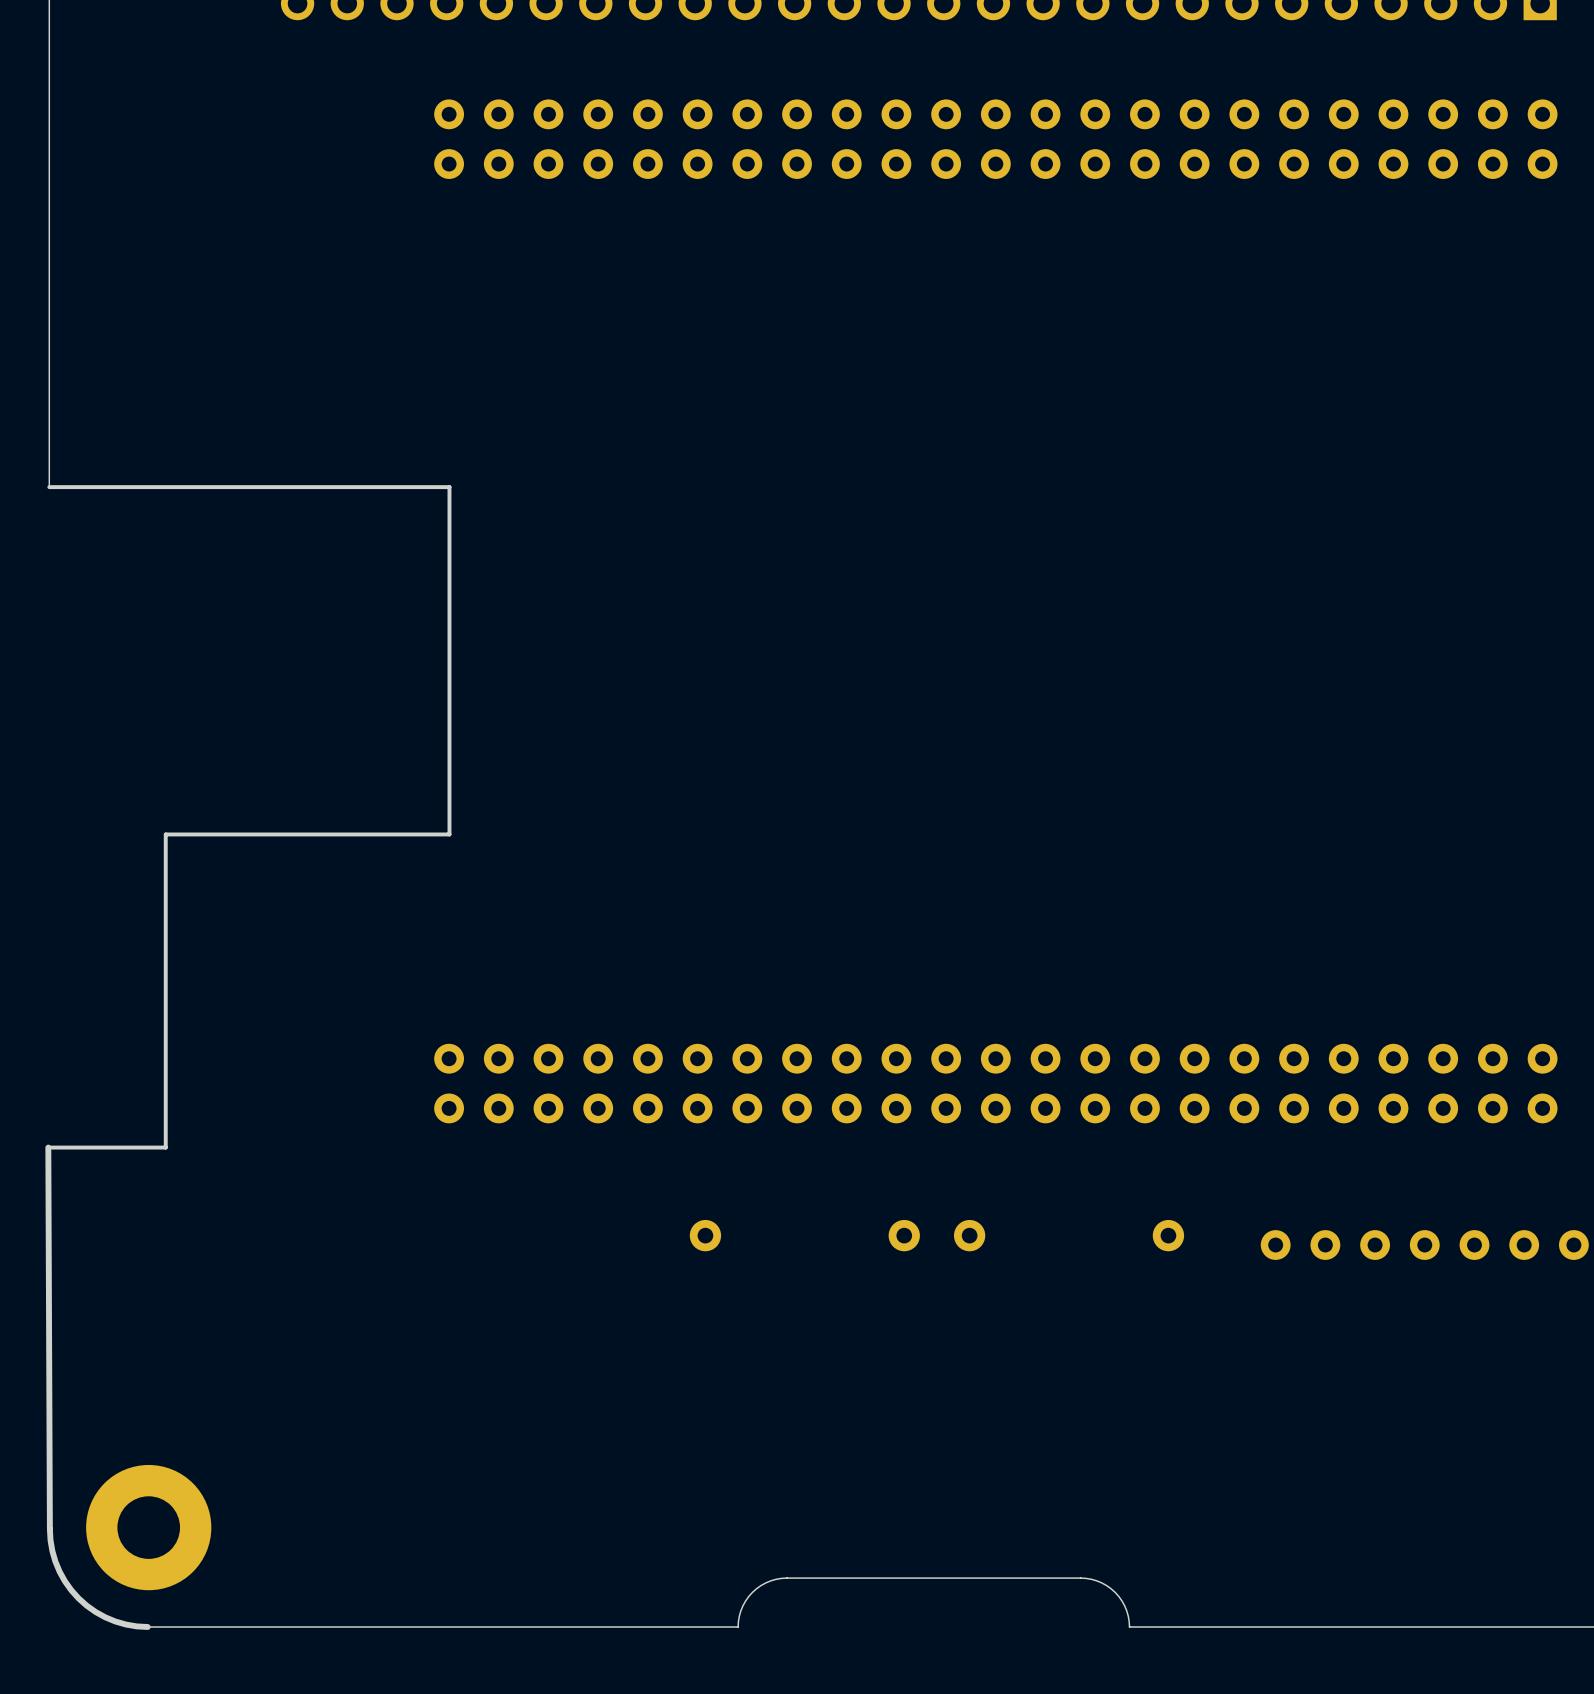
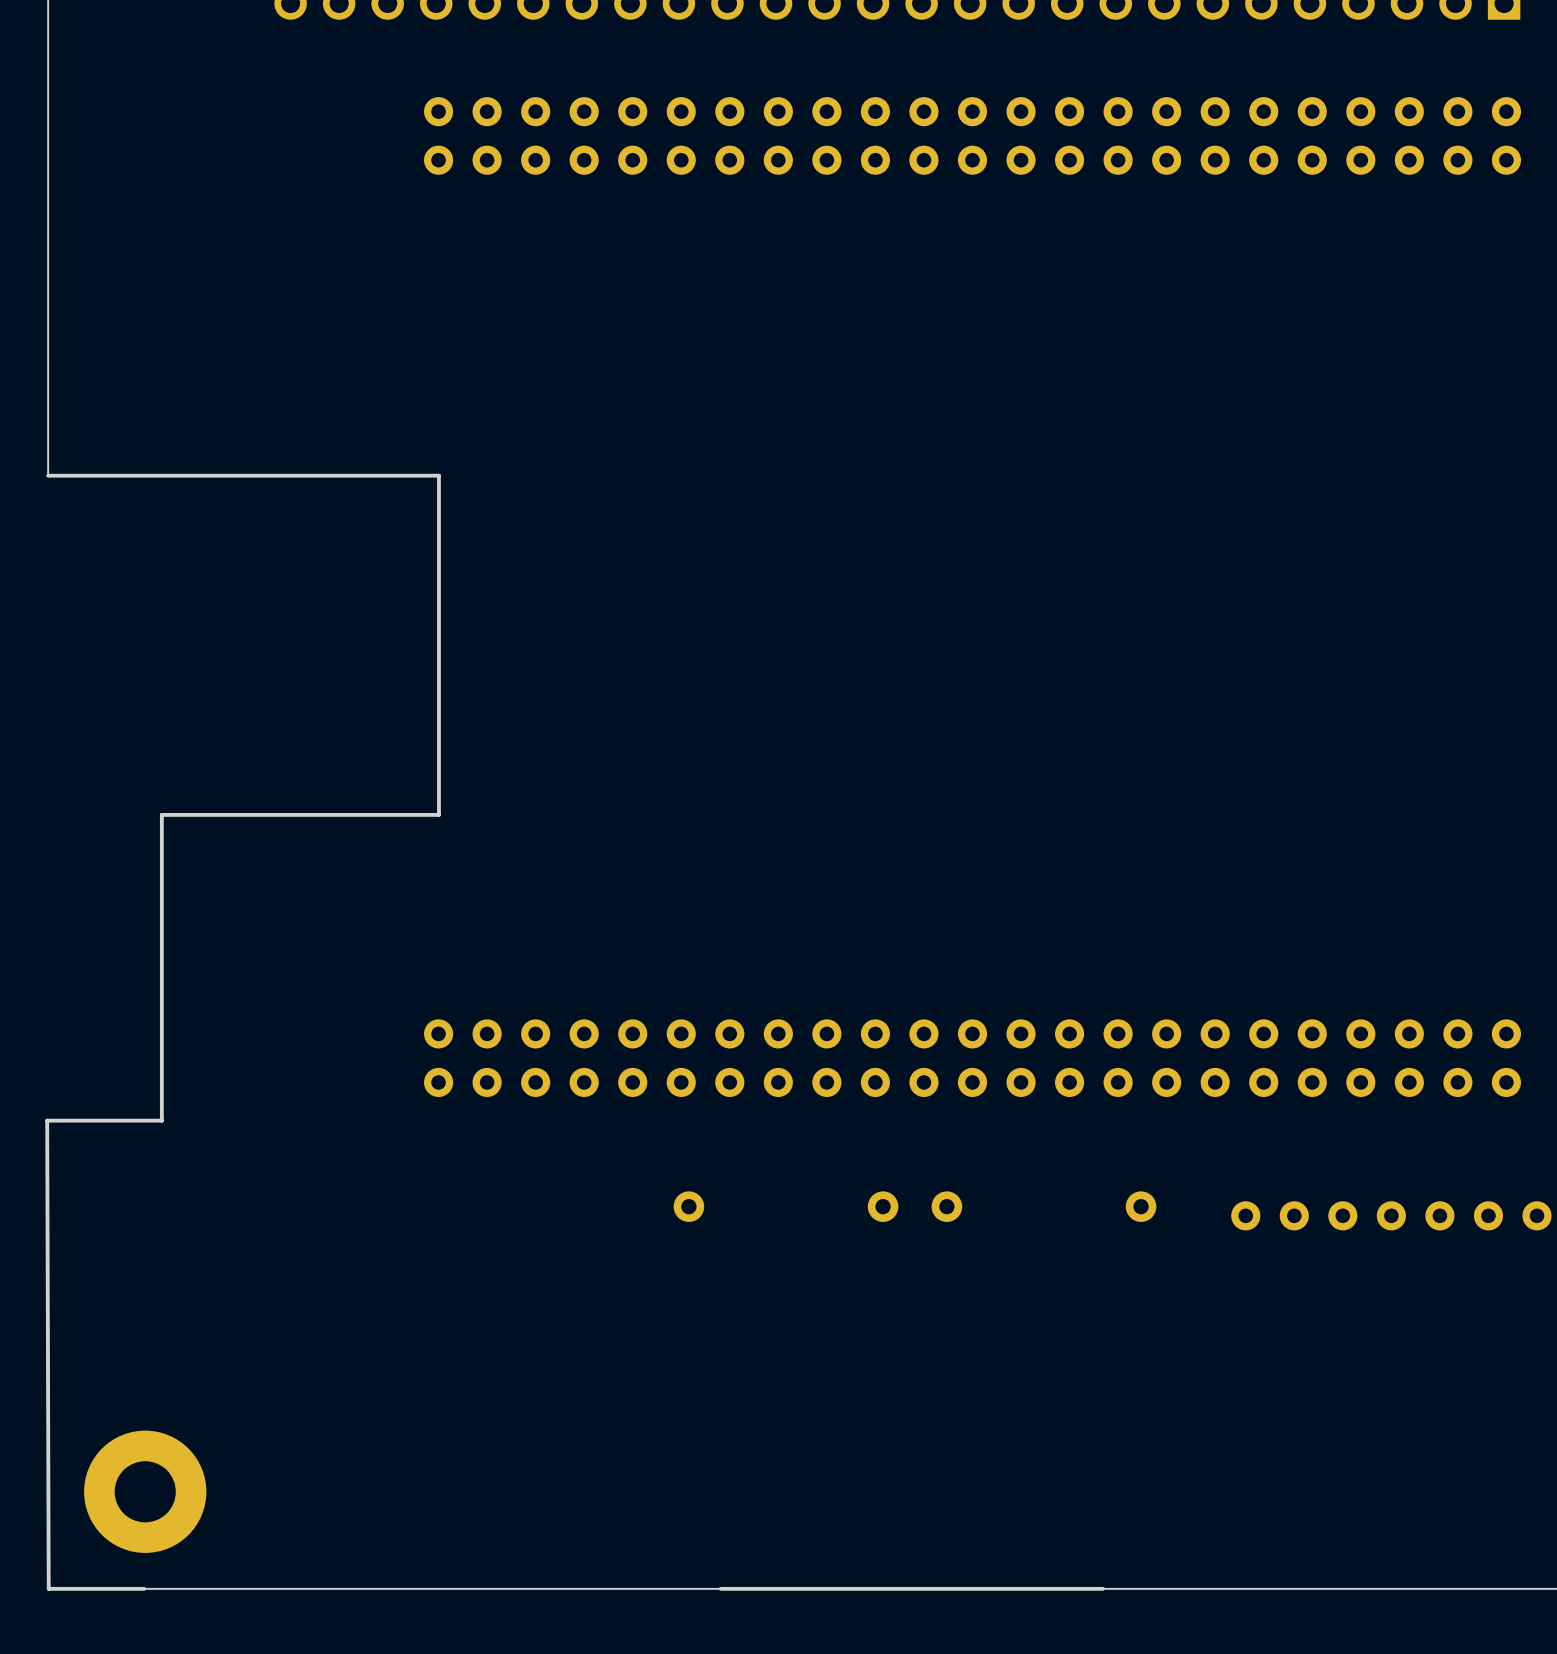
board edge: (48, 1147) (49, 1529) (52, 1550) (64, 1581) (86, 1605) (115, 1621) (147, 1627) -> (47, 1120) (48, 1588) (144, 1588)
board edge: (1129, 1627) (1126, 1610) (1115, 1592) (1101, 1582) (1080, 1578) (781, 1578) (765, 1582) (752, 1592) (742, 1605) (738, 1627) -> (1103, 1588) (720, 1588)

